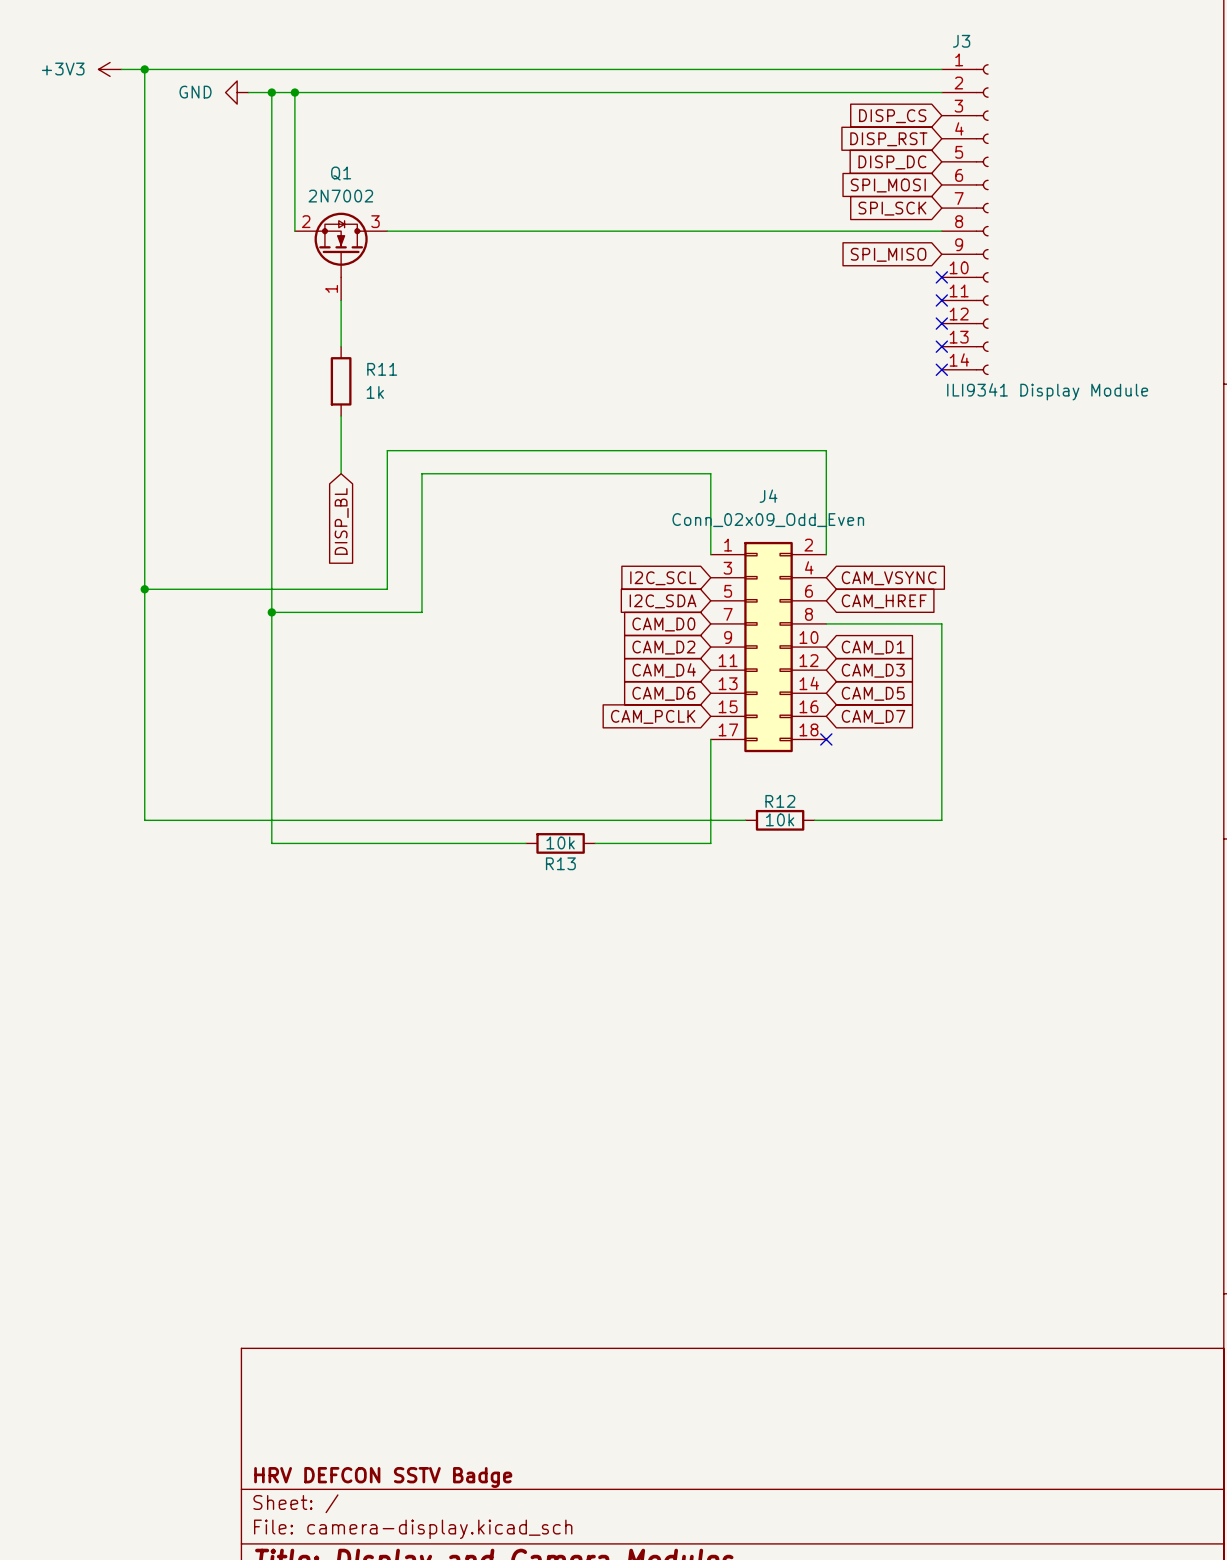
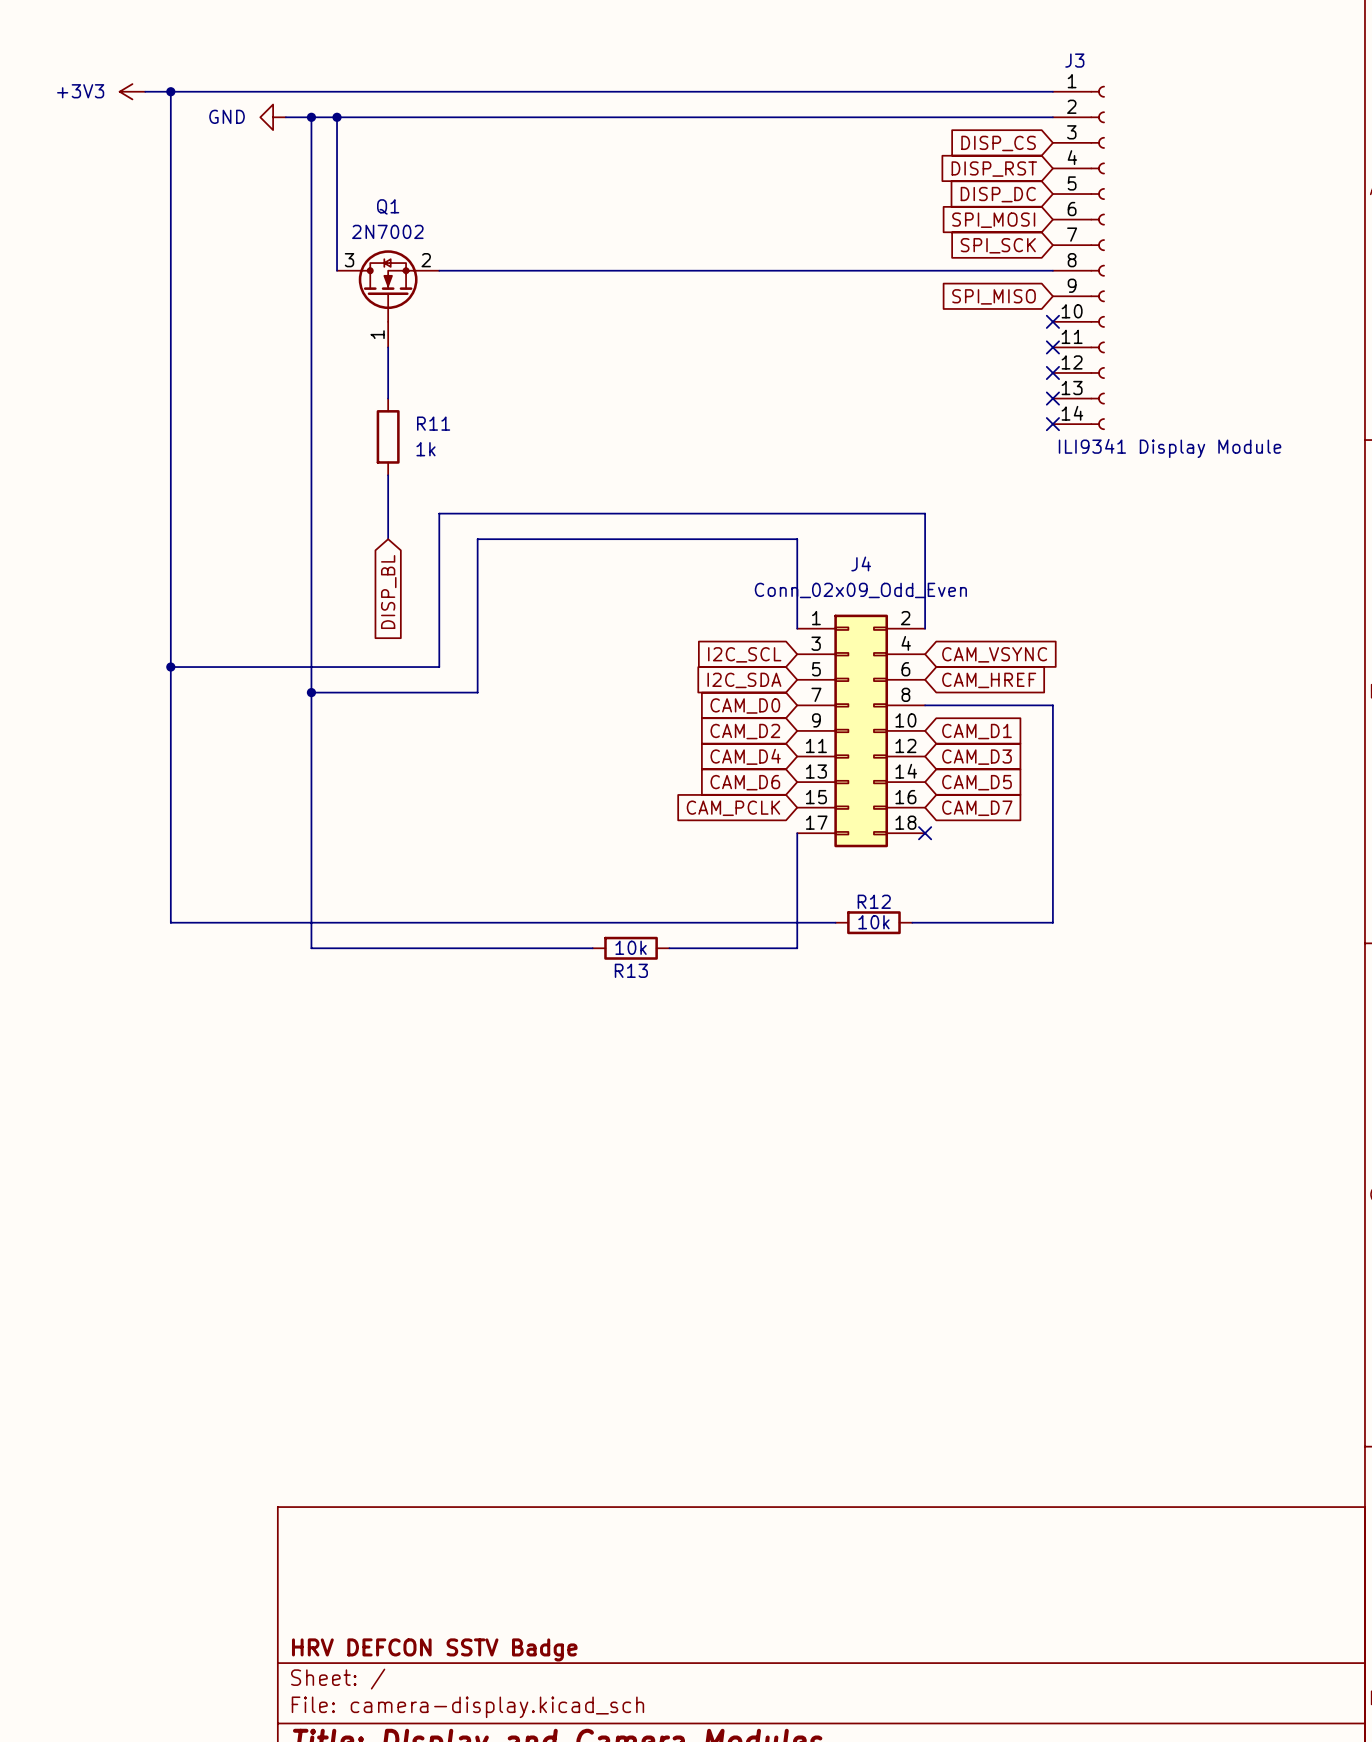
Q1 flip: as is (341, 245) -> left-right (388, 286)

